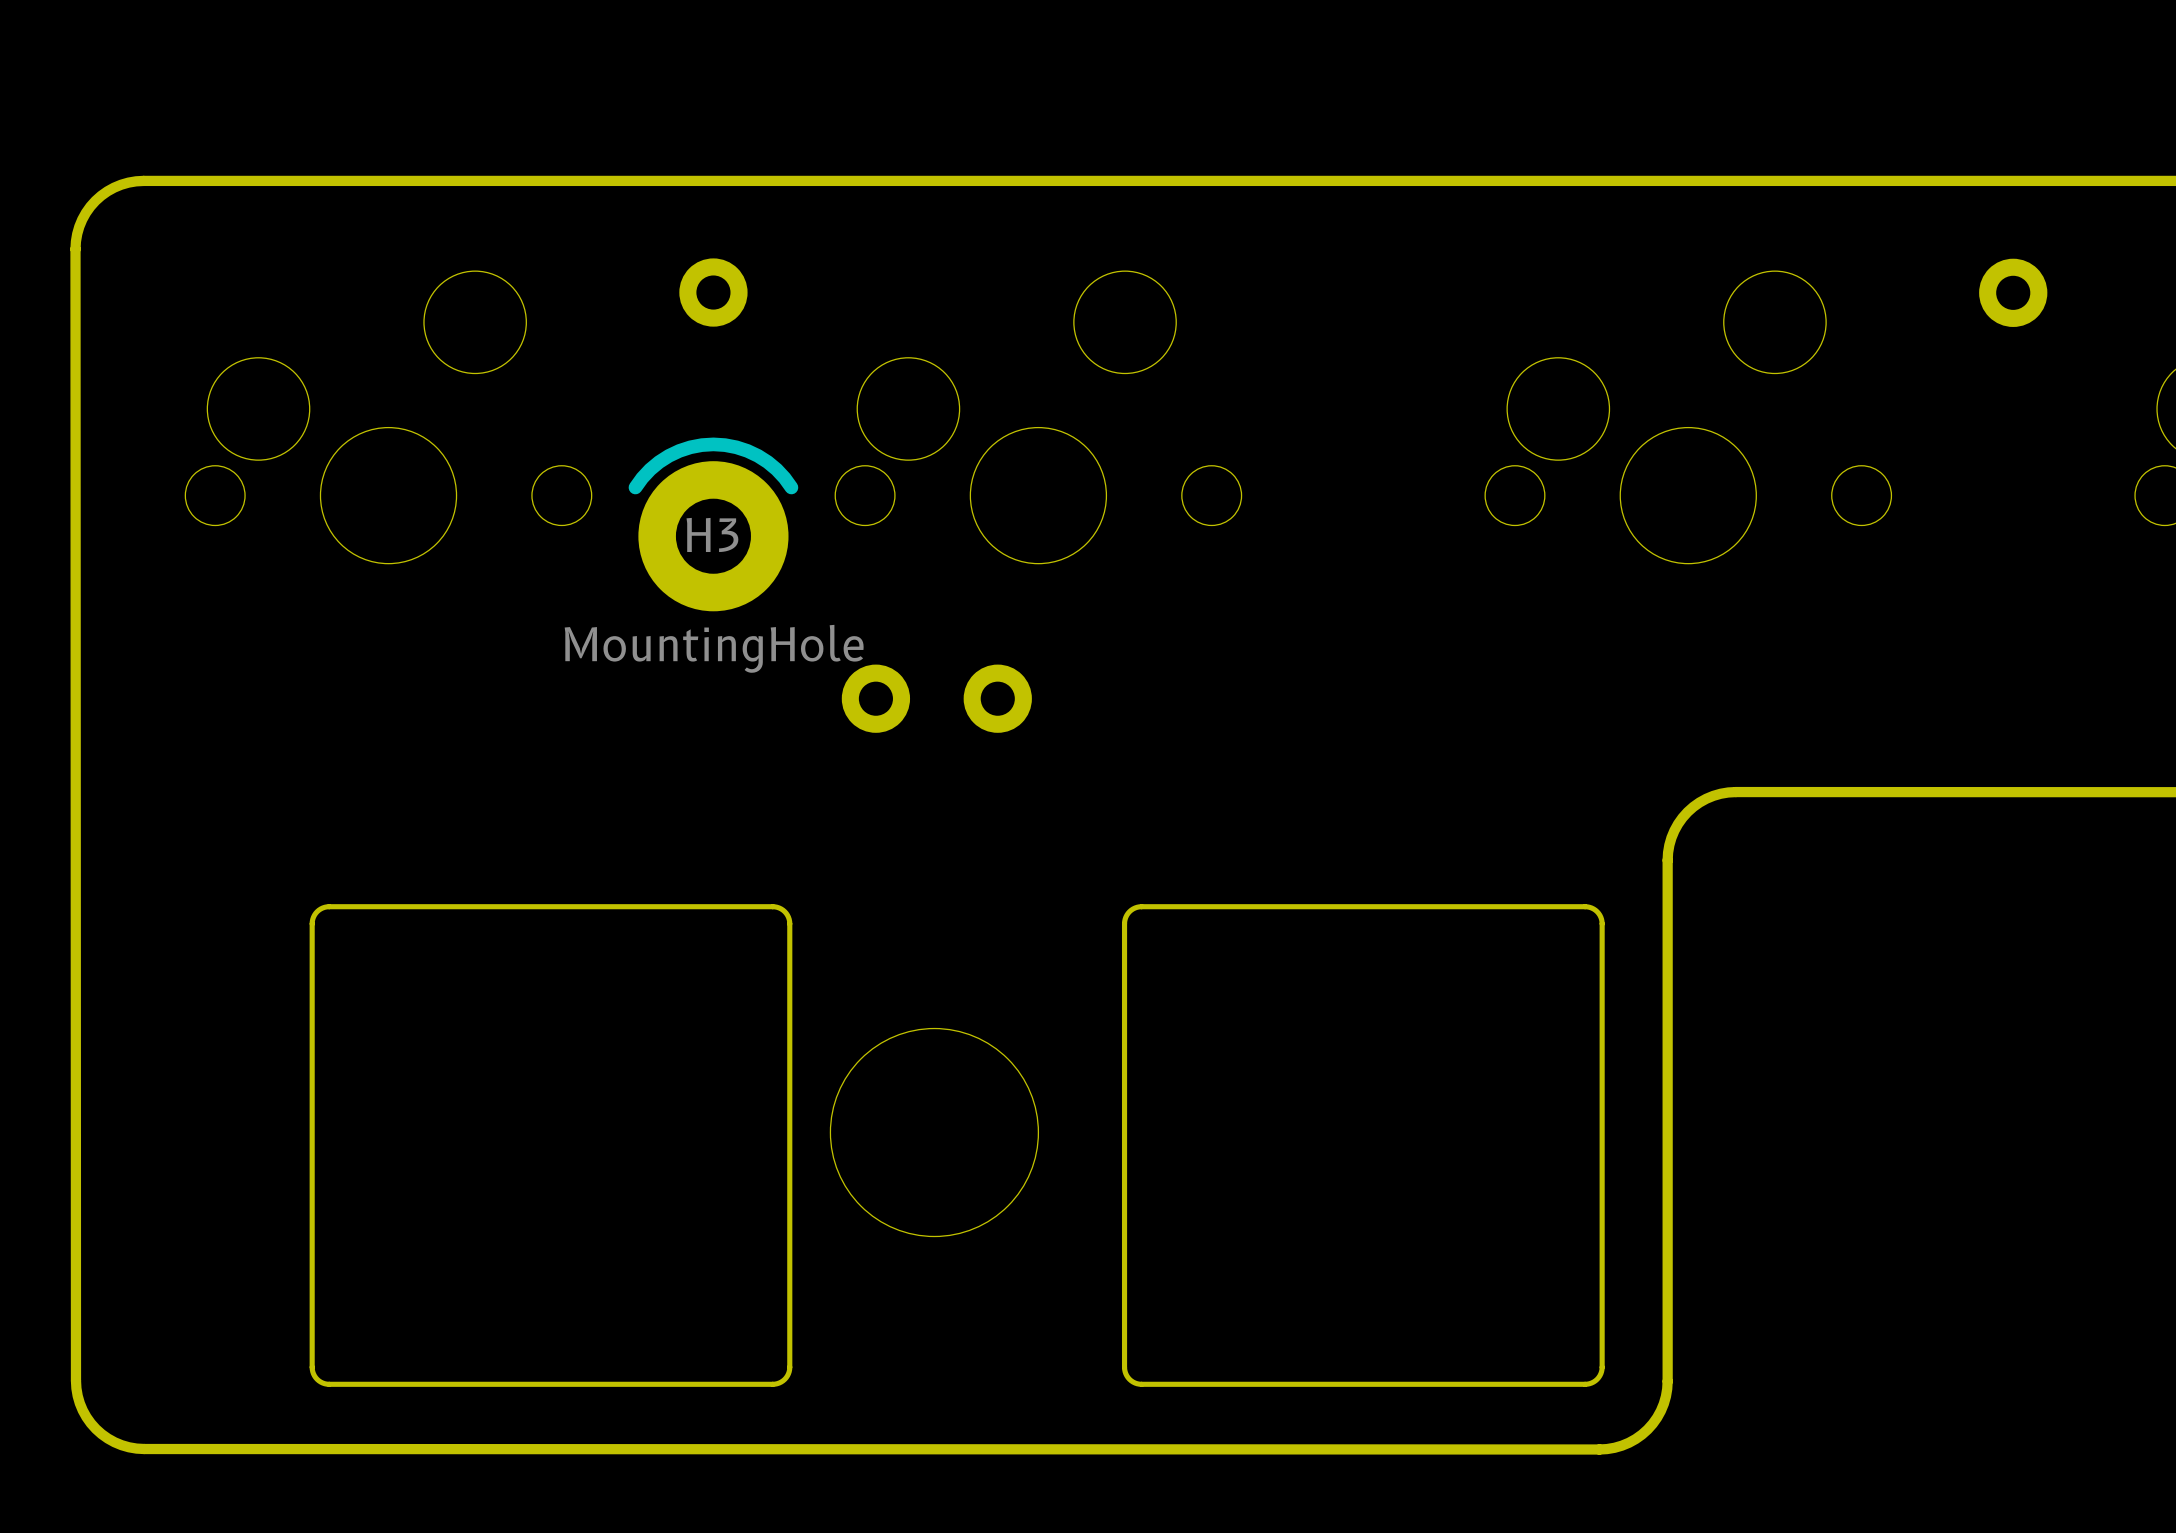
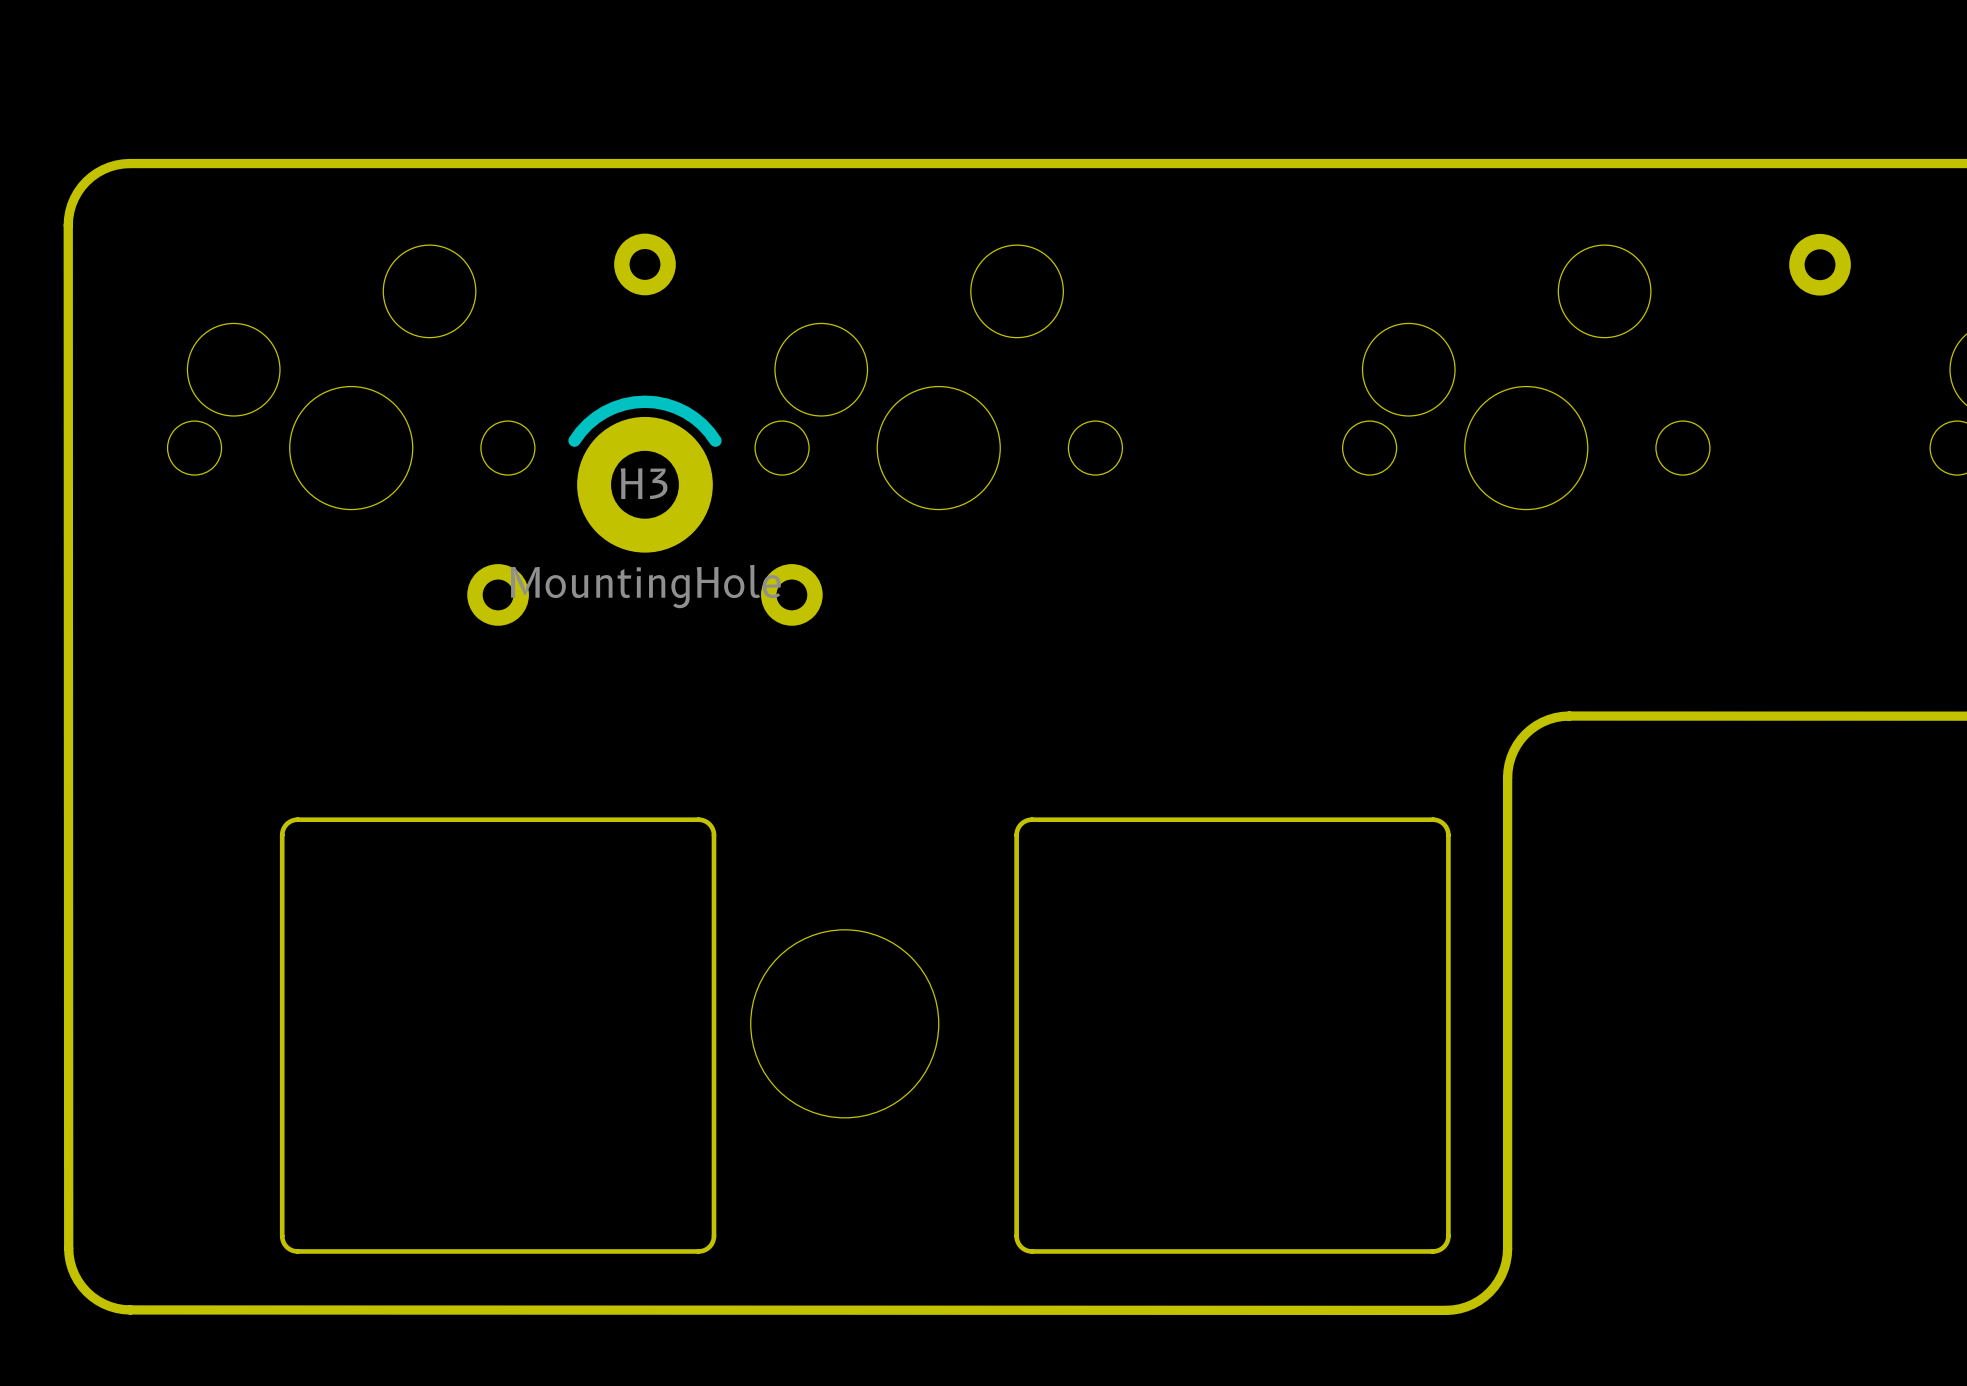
part: none -> (498, 594)
part position: (875, 698) -> (791, 594)
part: (997, 698) -> none

